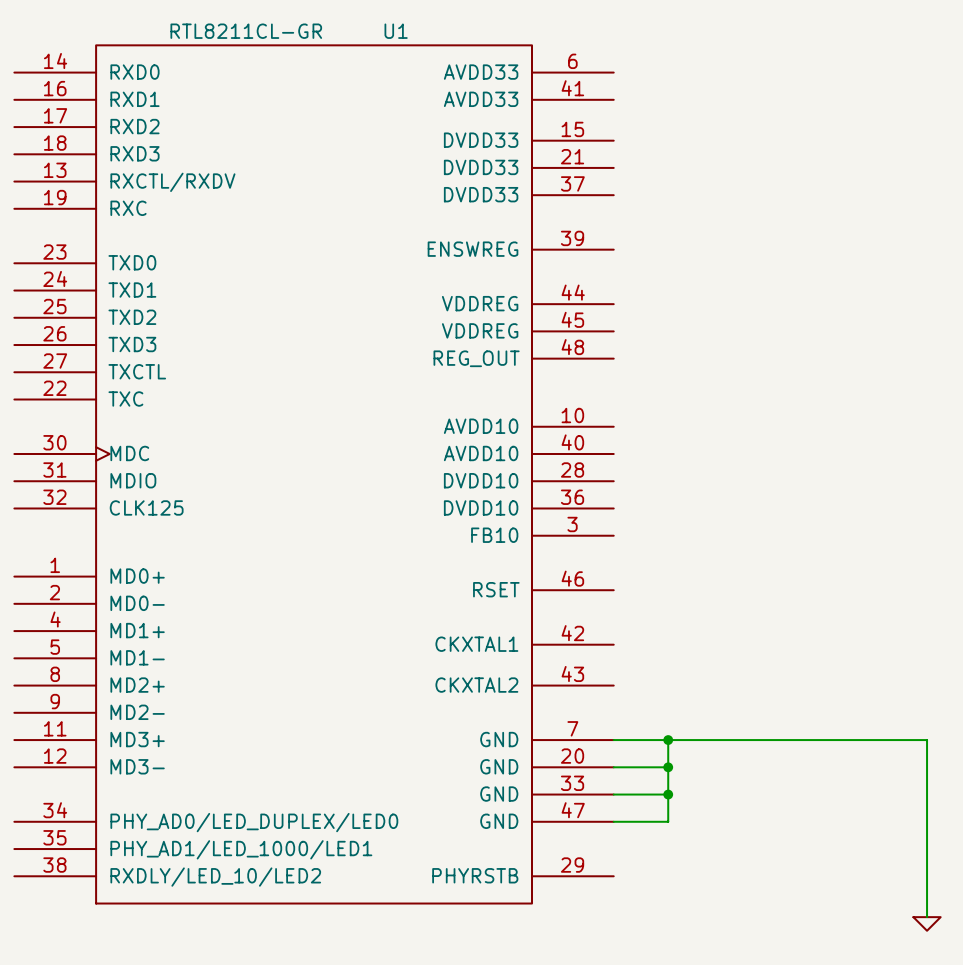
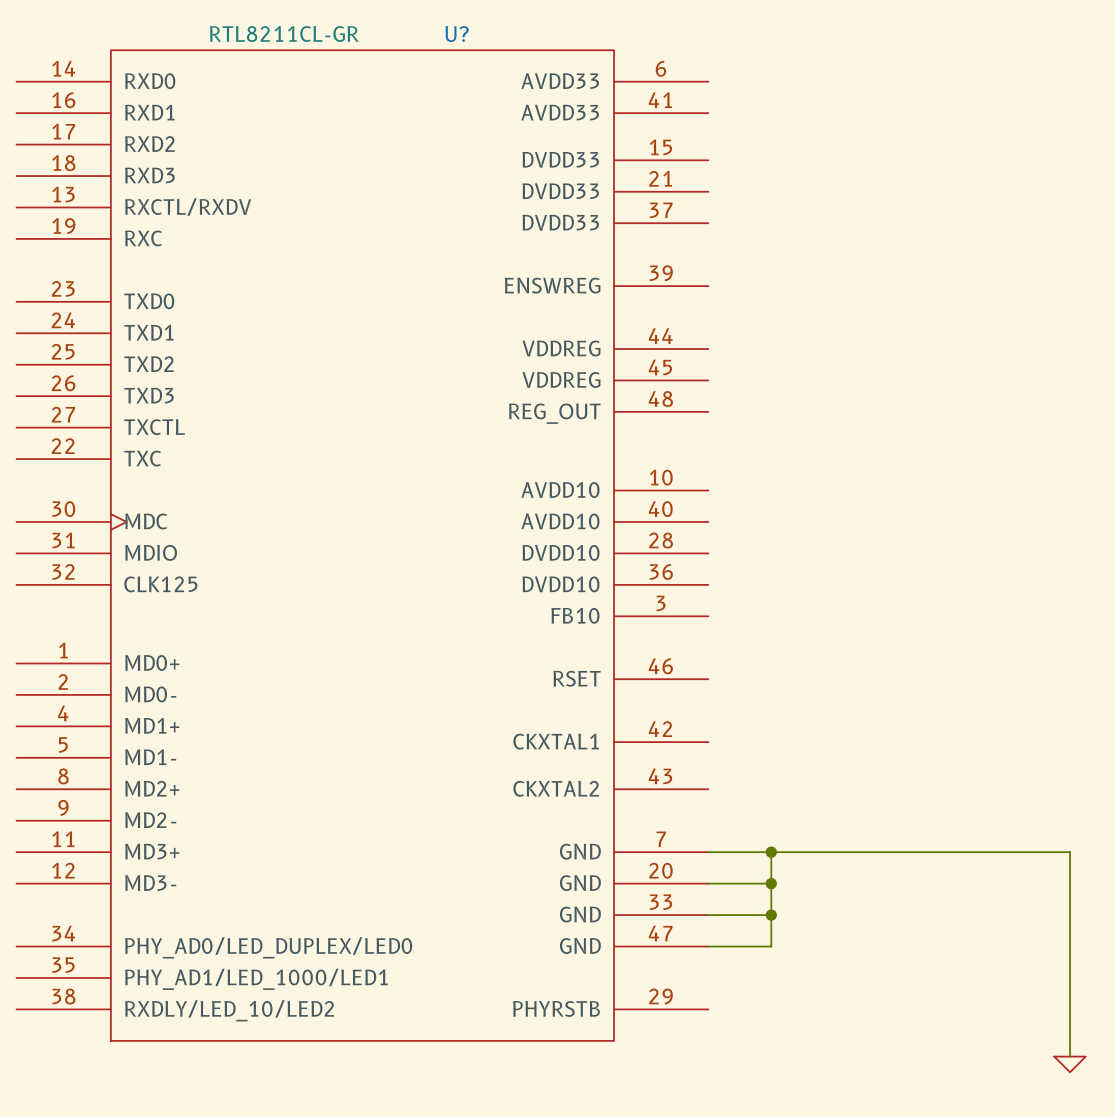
U1 name: U1 (396, 31) -> U? (457, 34)

